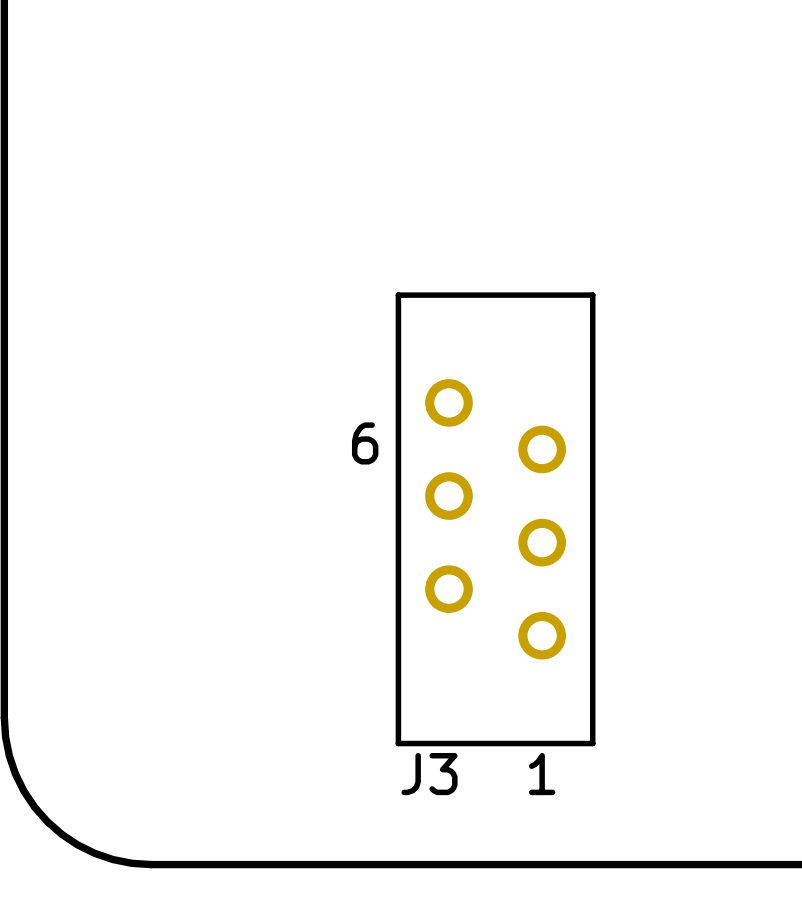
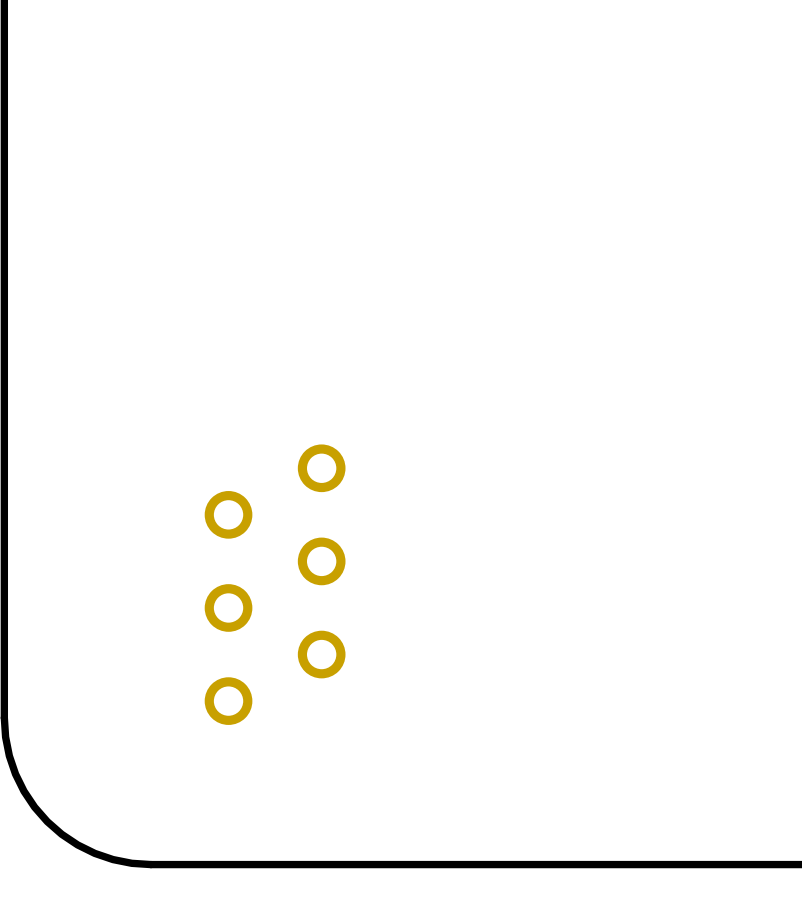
J3 side: bottom (495, 519) -> top (275, 584)

